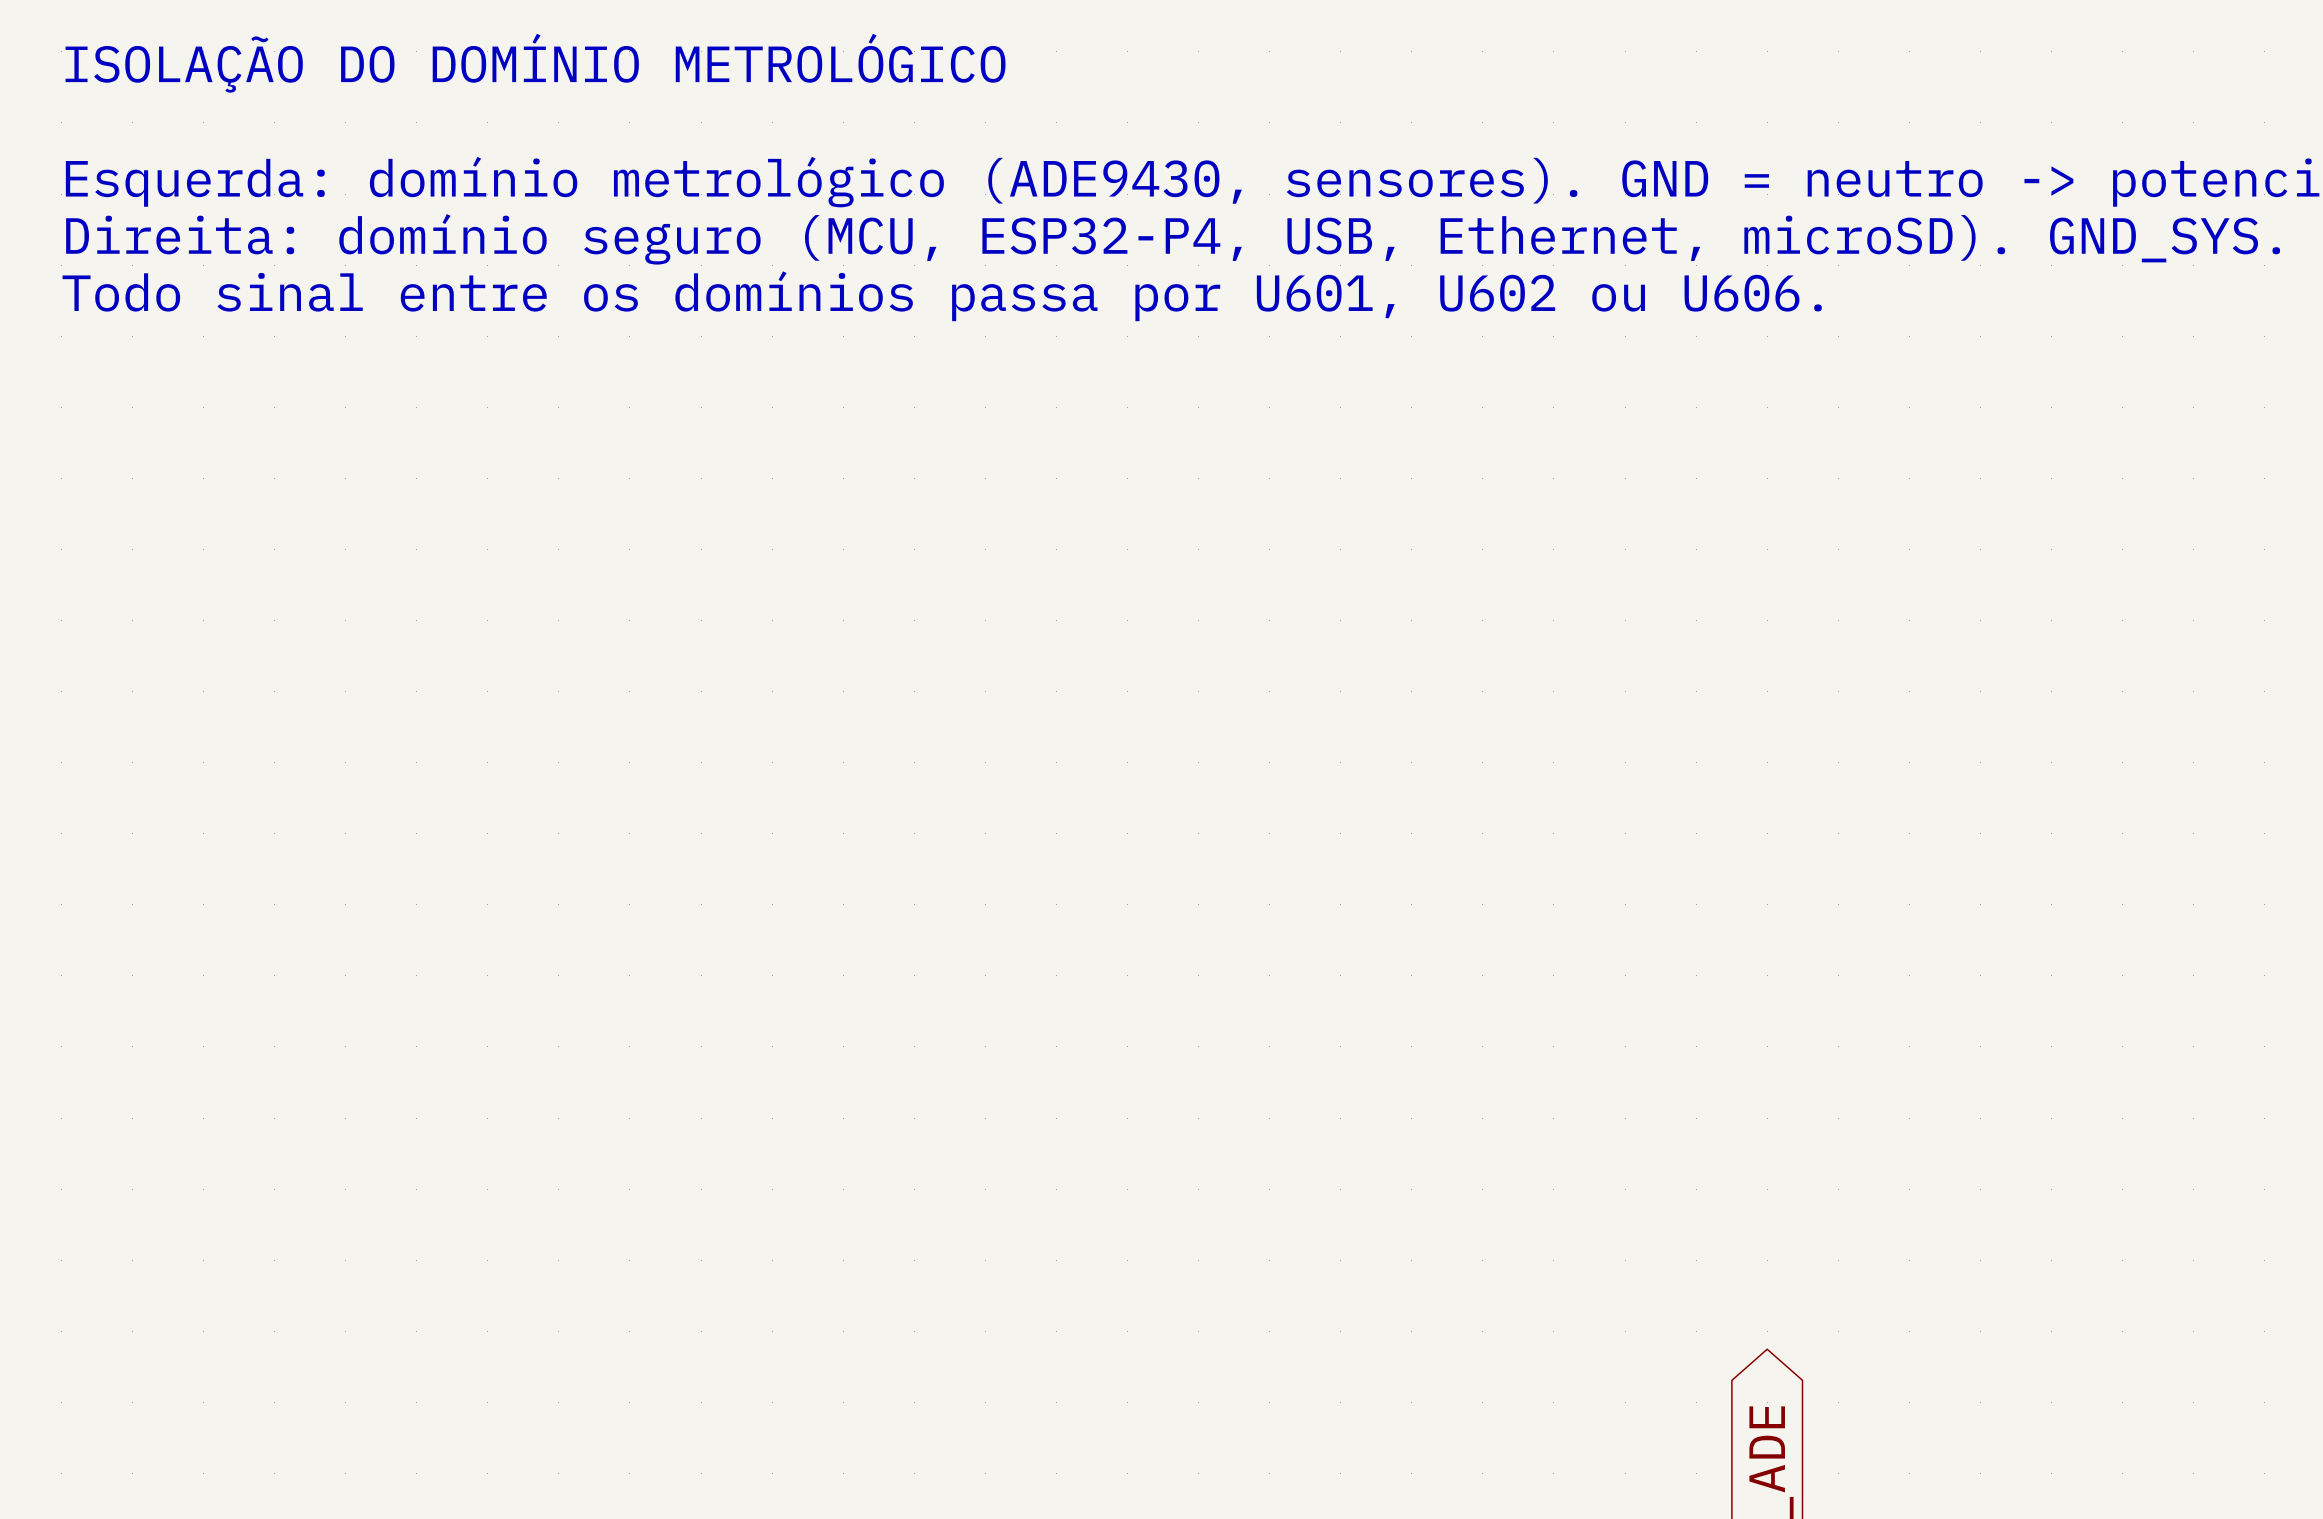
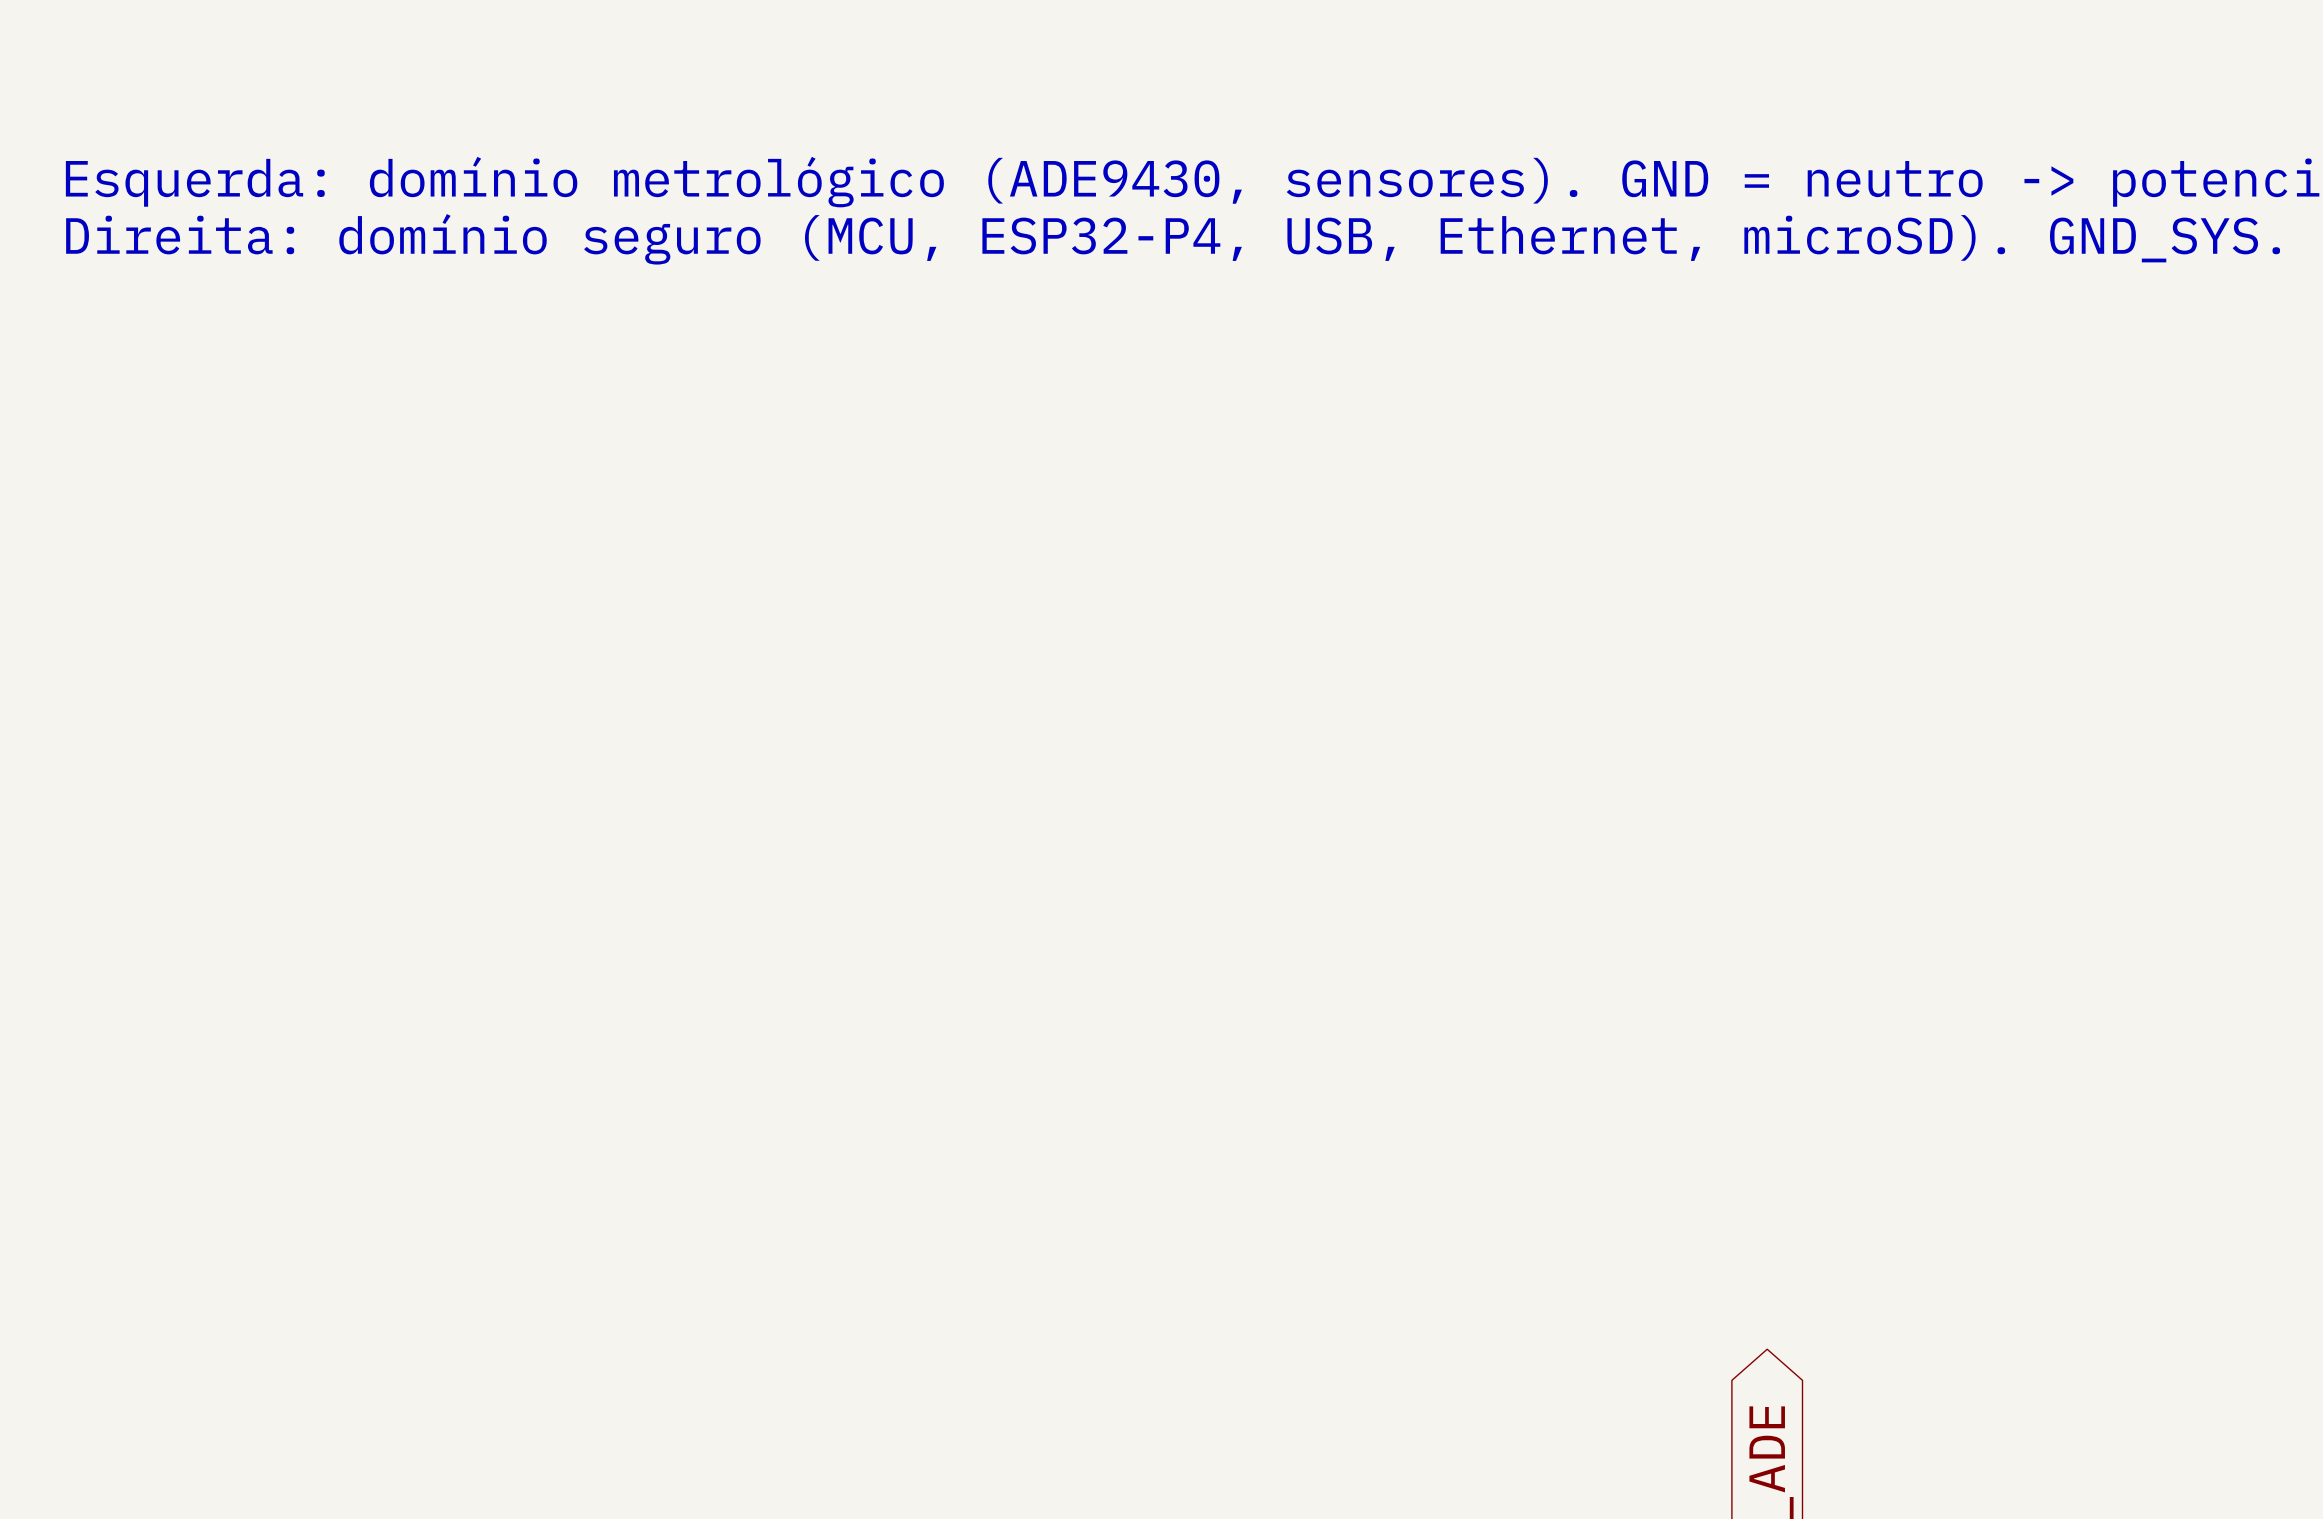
text: ISOLAÇÃO DO DOMÍNIO METROLÓGICO (535, 63) -> none
text: Todo sinal entre os domínios passa por U601, U602 ou U606. (942, 296) -> none

